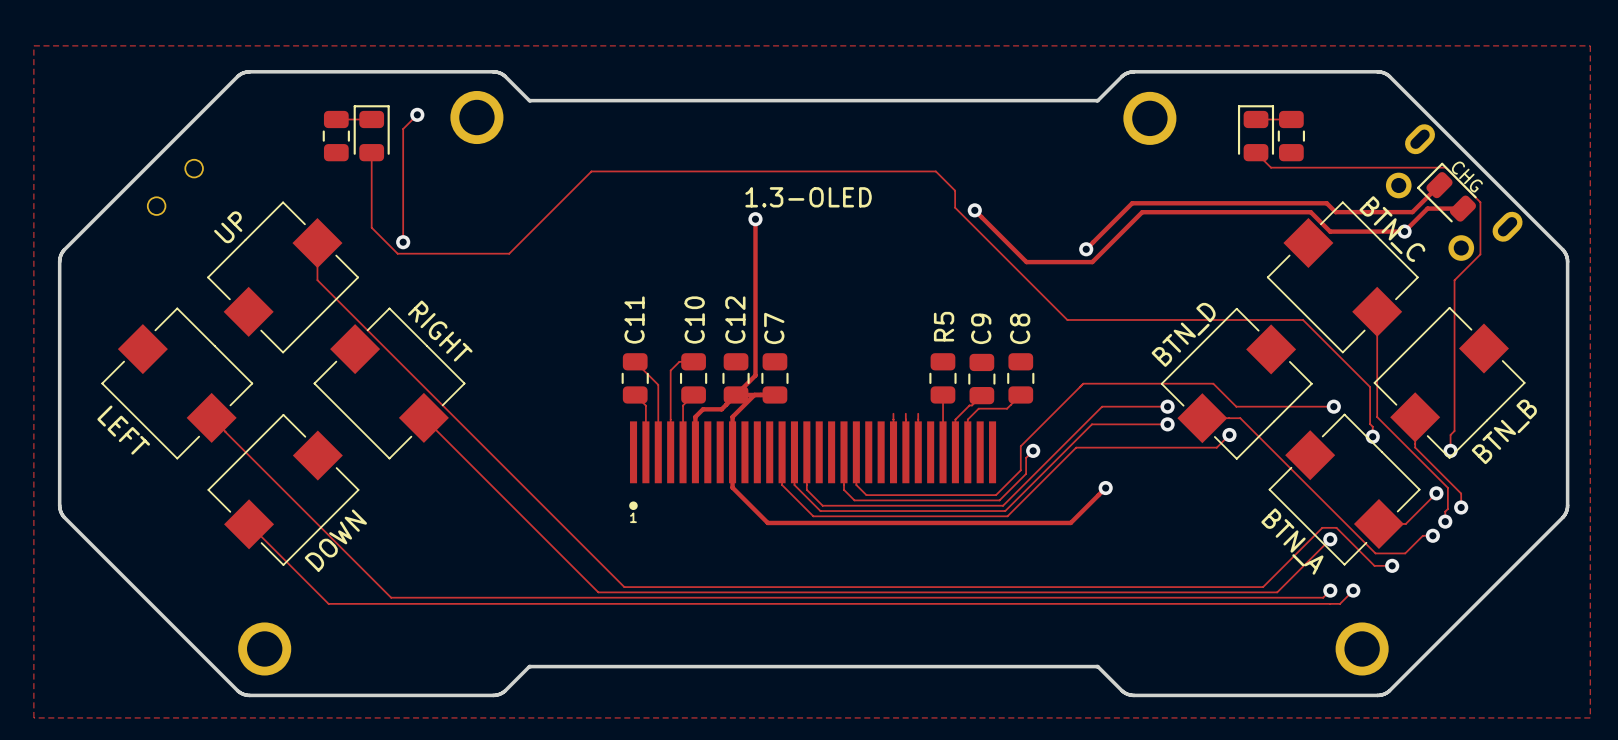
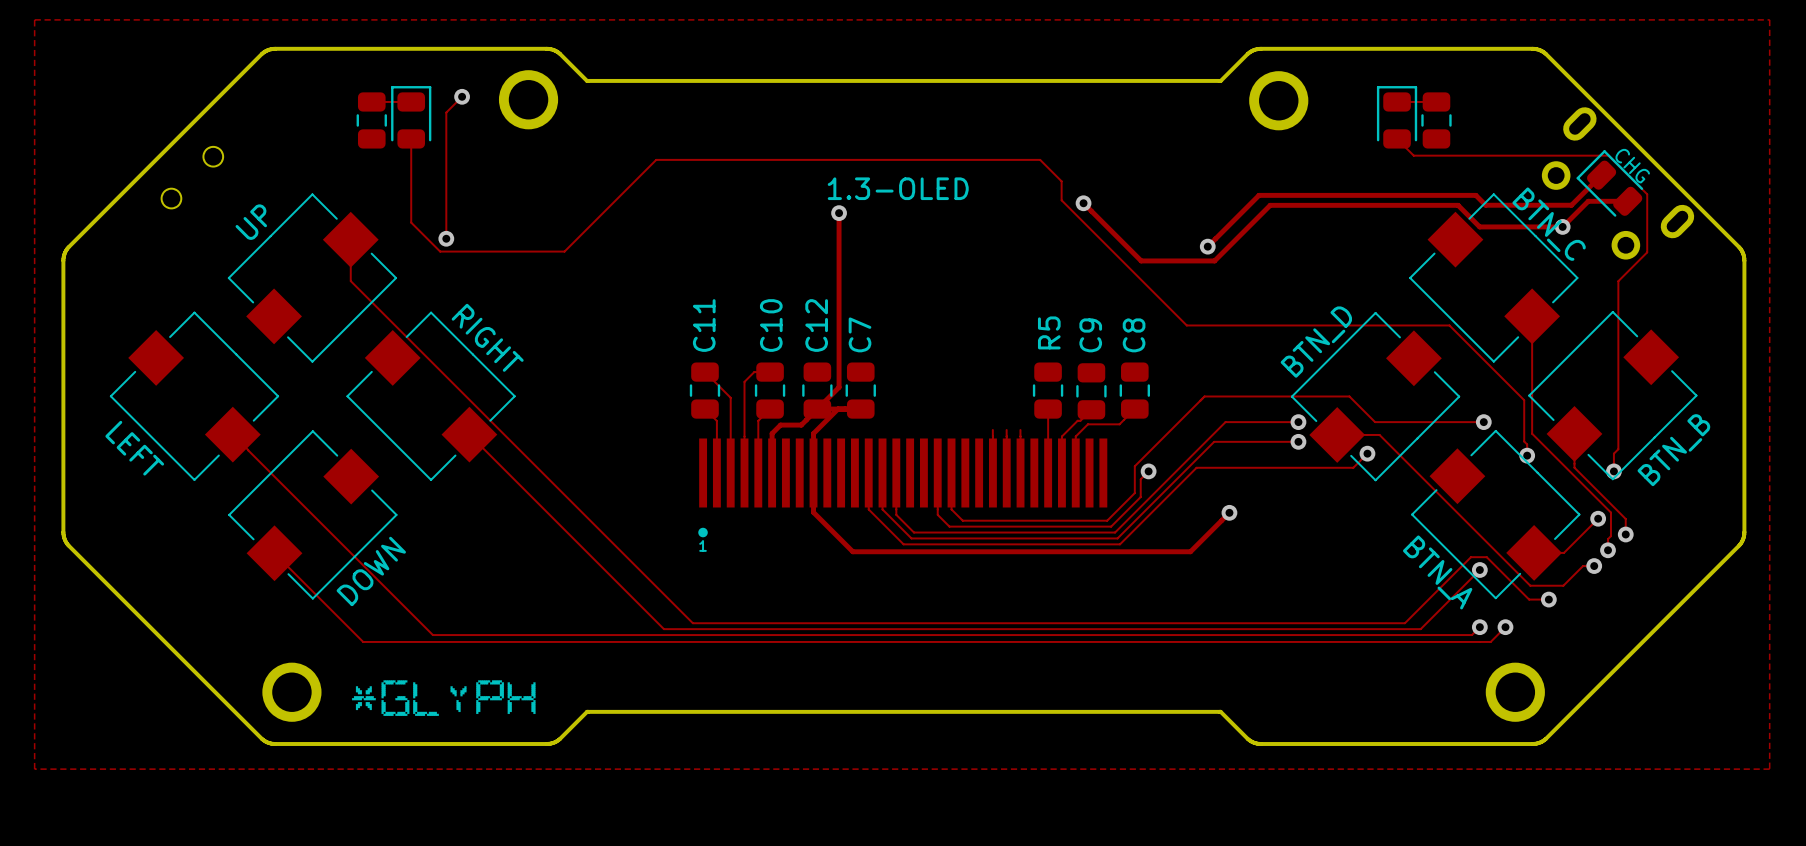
drawing: none -> [351, 680, 536, 716]

